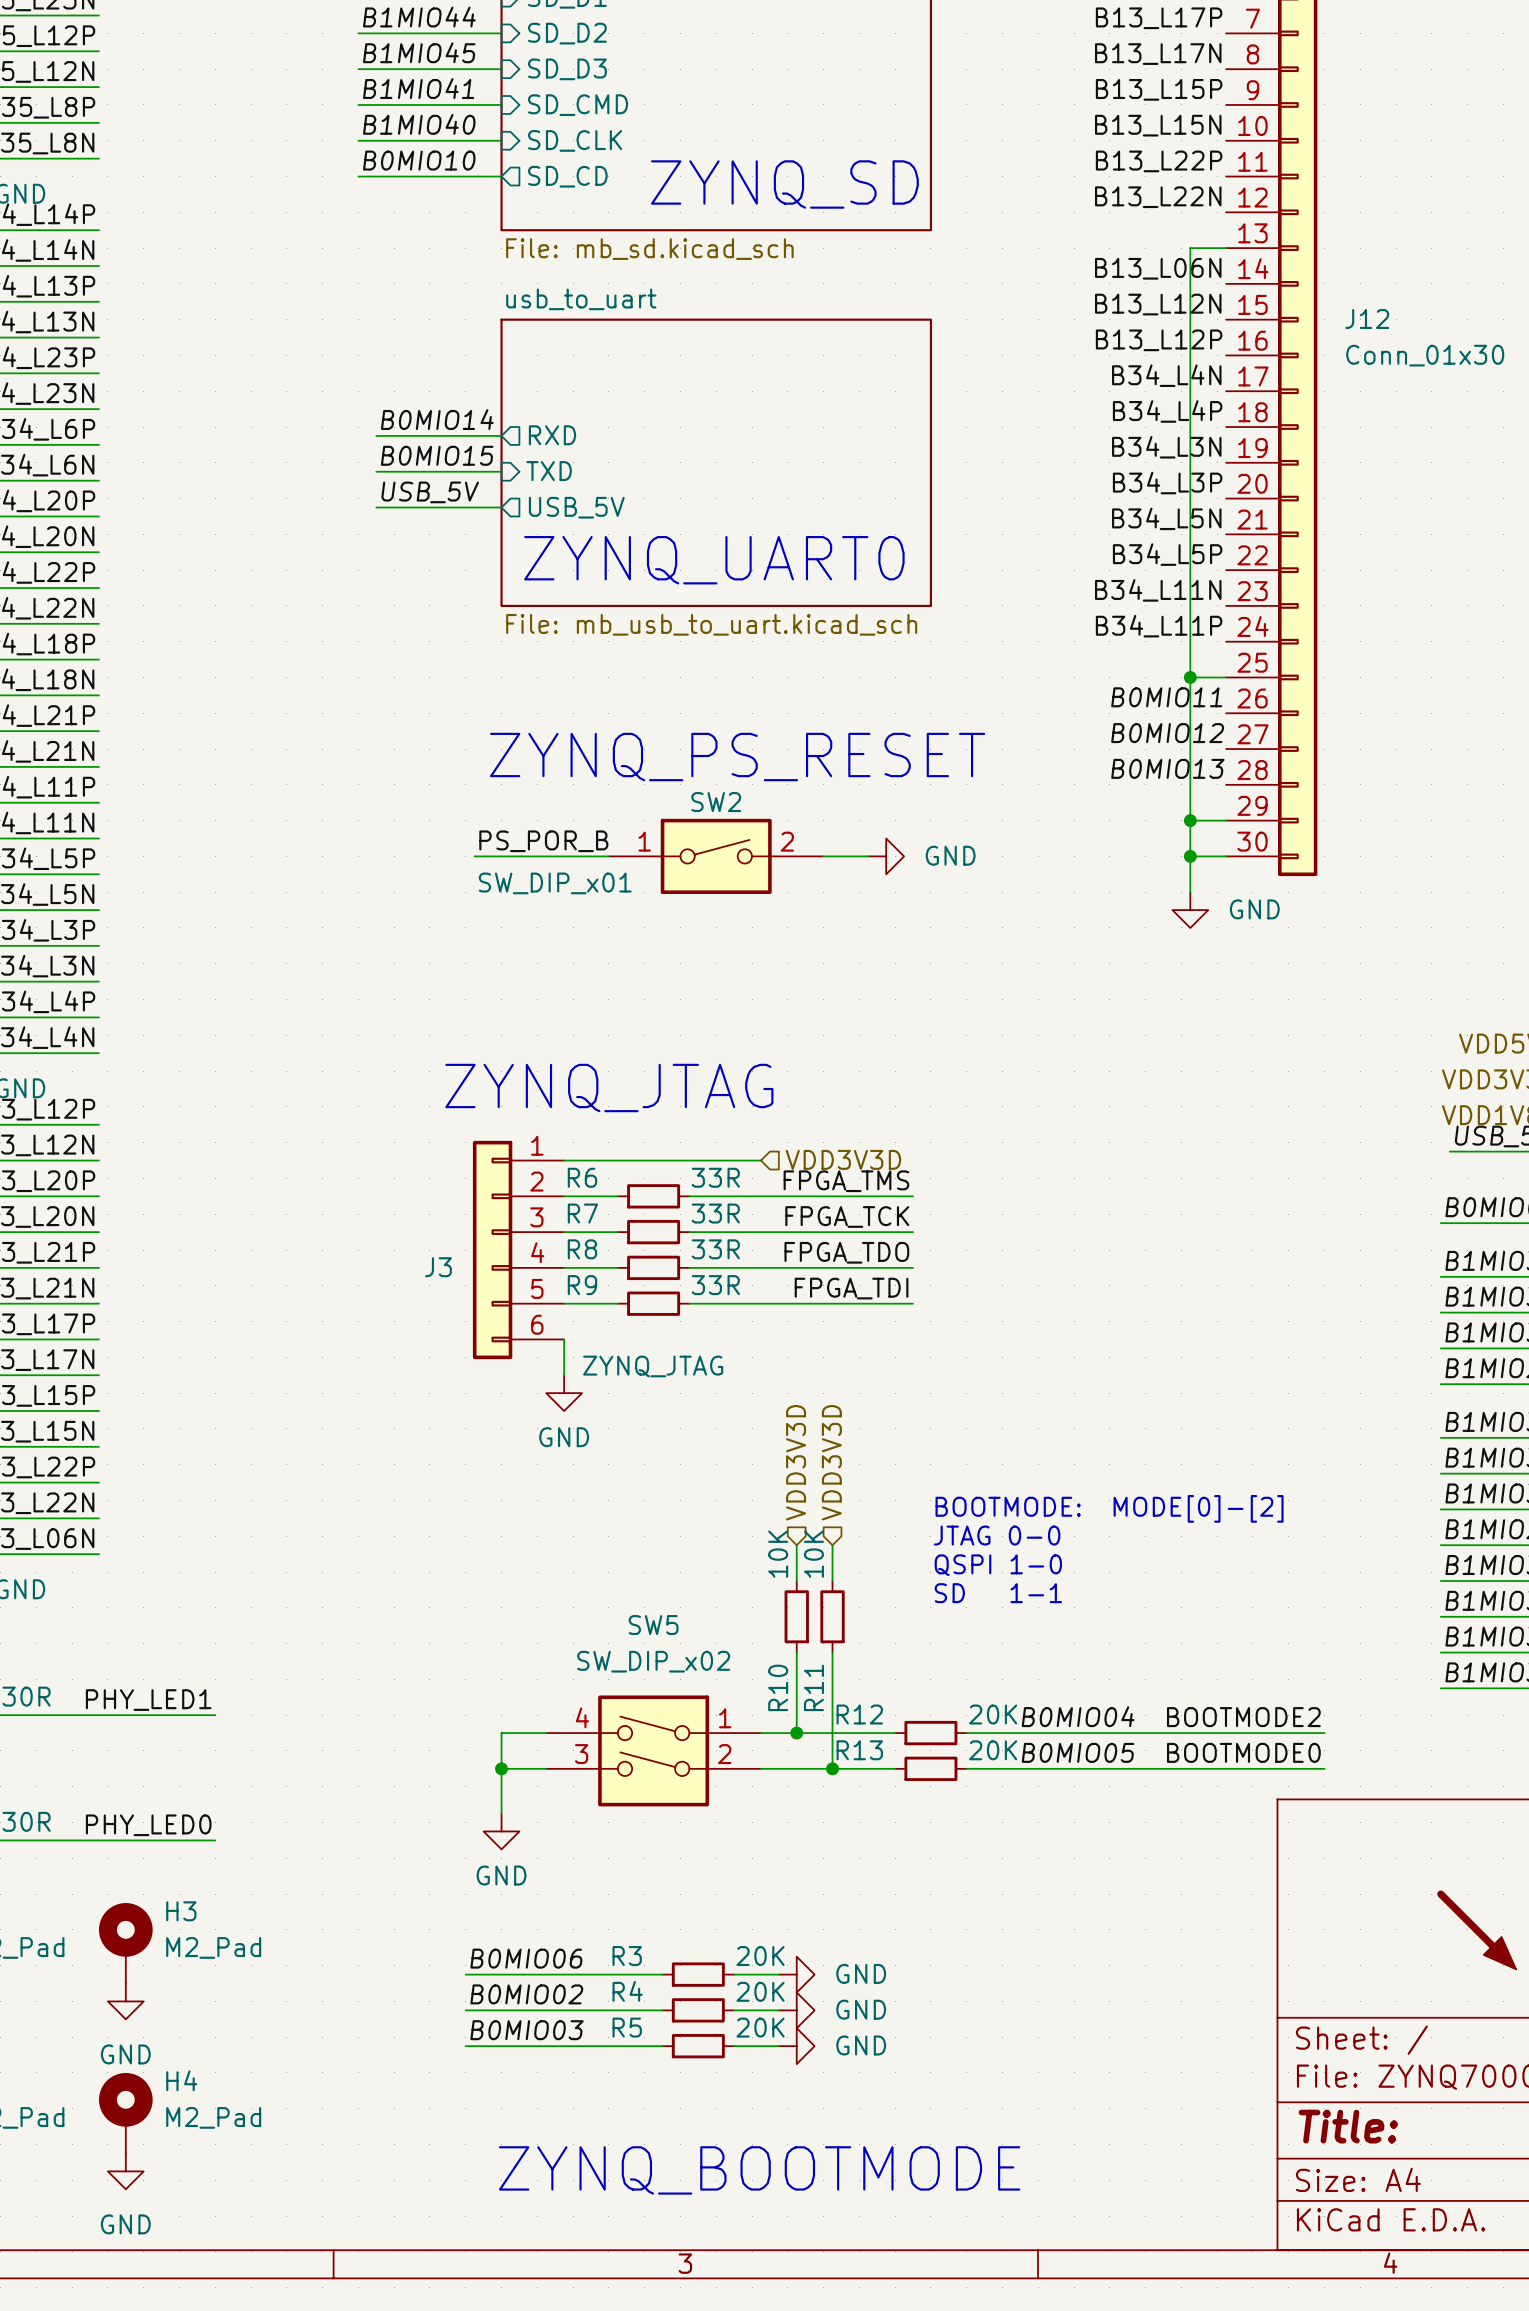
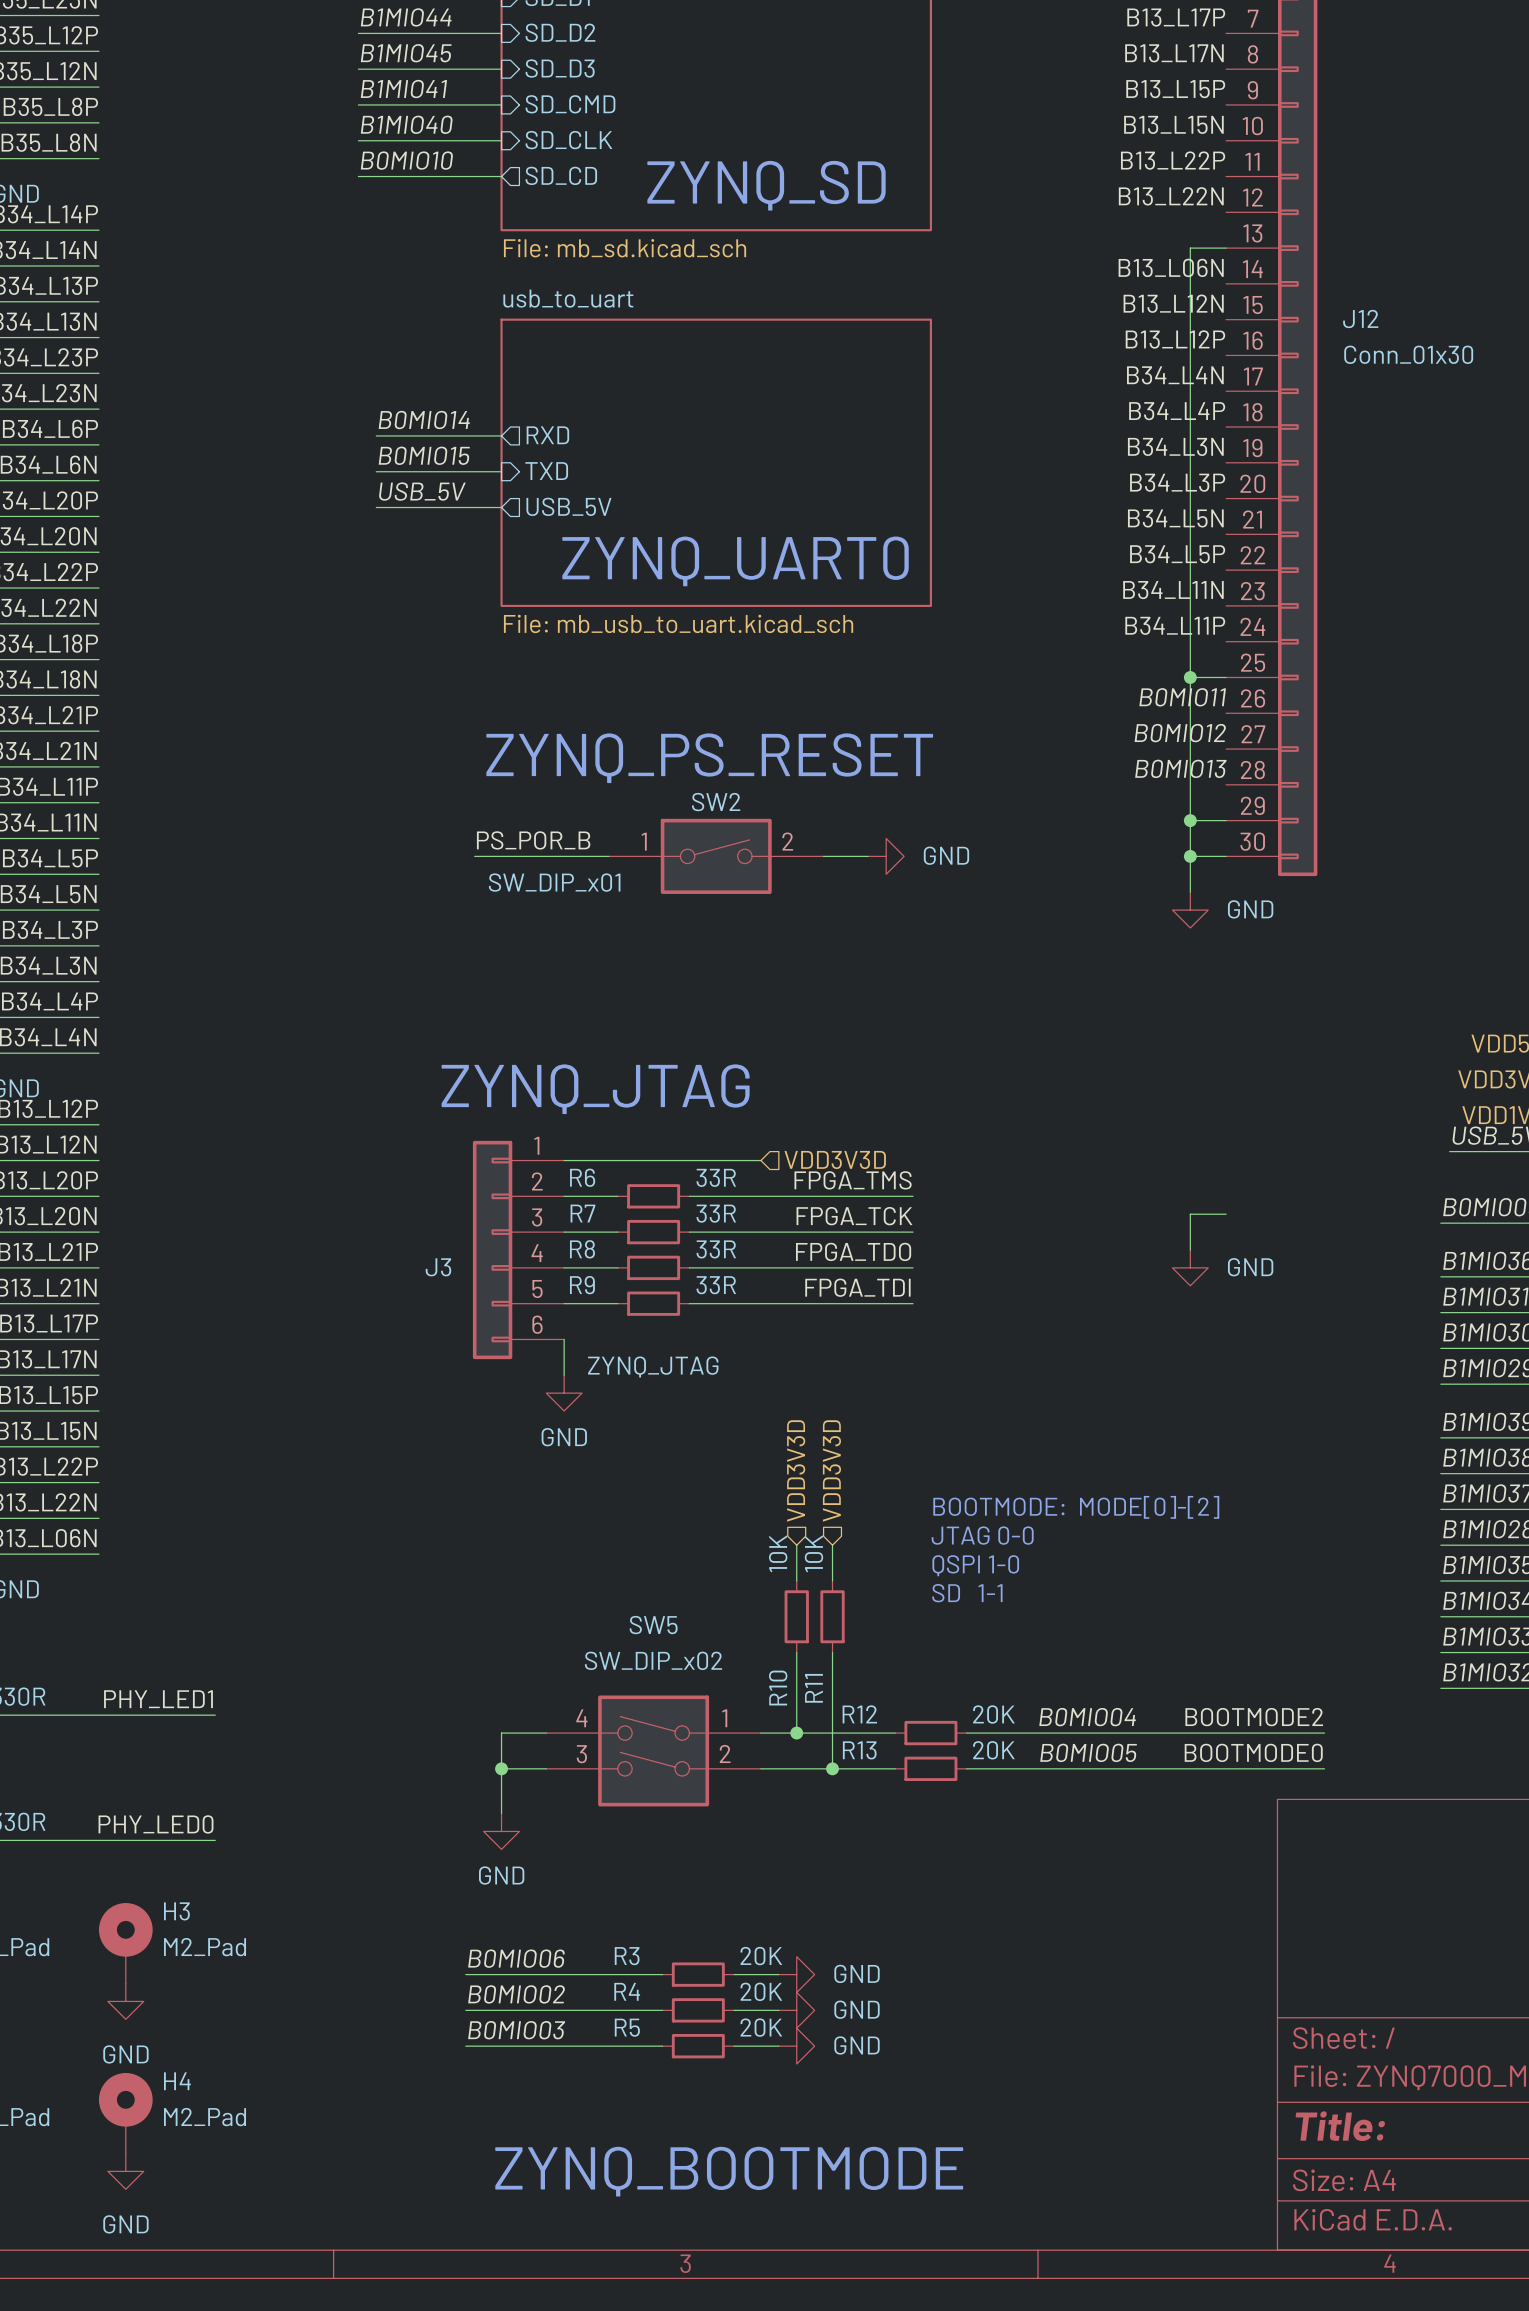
wire: none -> (1226, 1214) (1190, 1214) (1190, 1250)
power symbol: none -> GND (1190, 1267)
part: (1476, 1929) -> none

